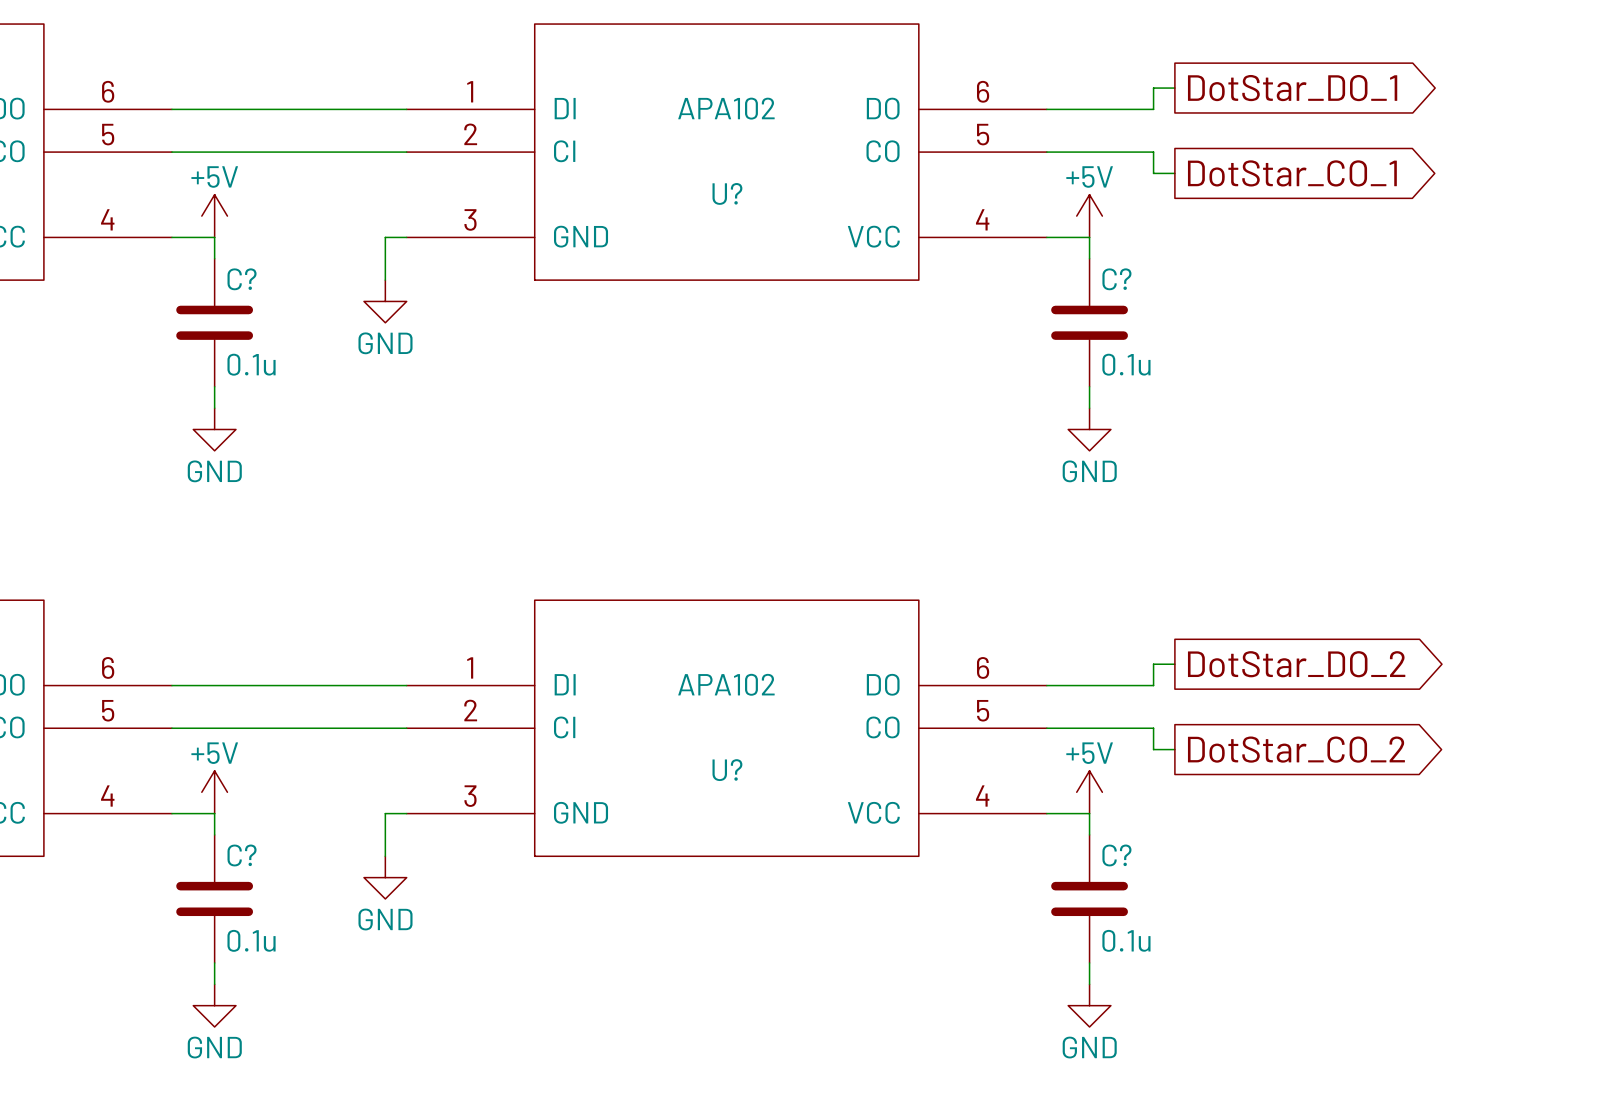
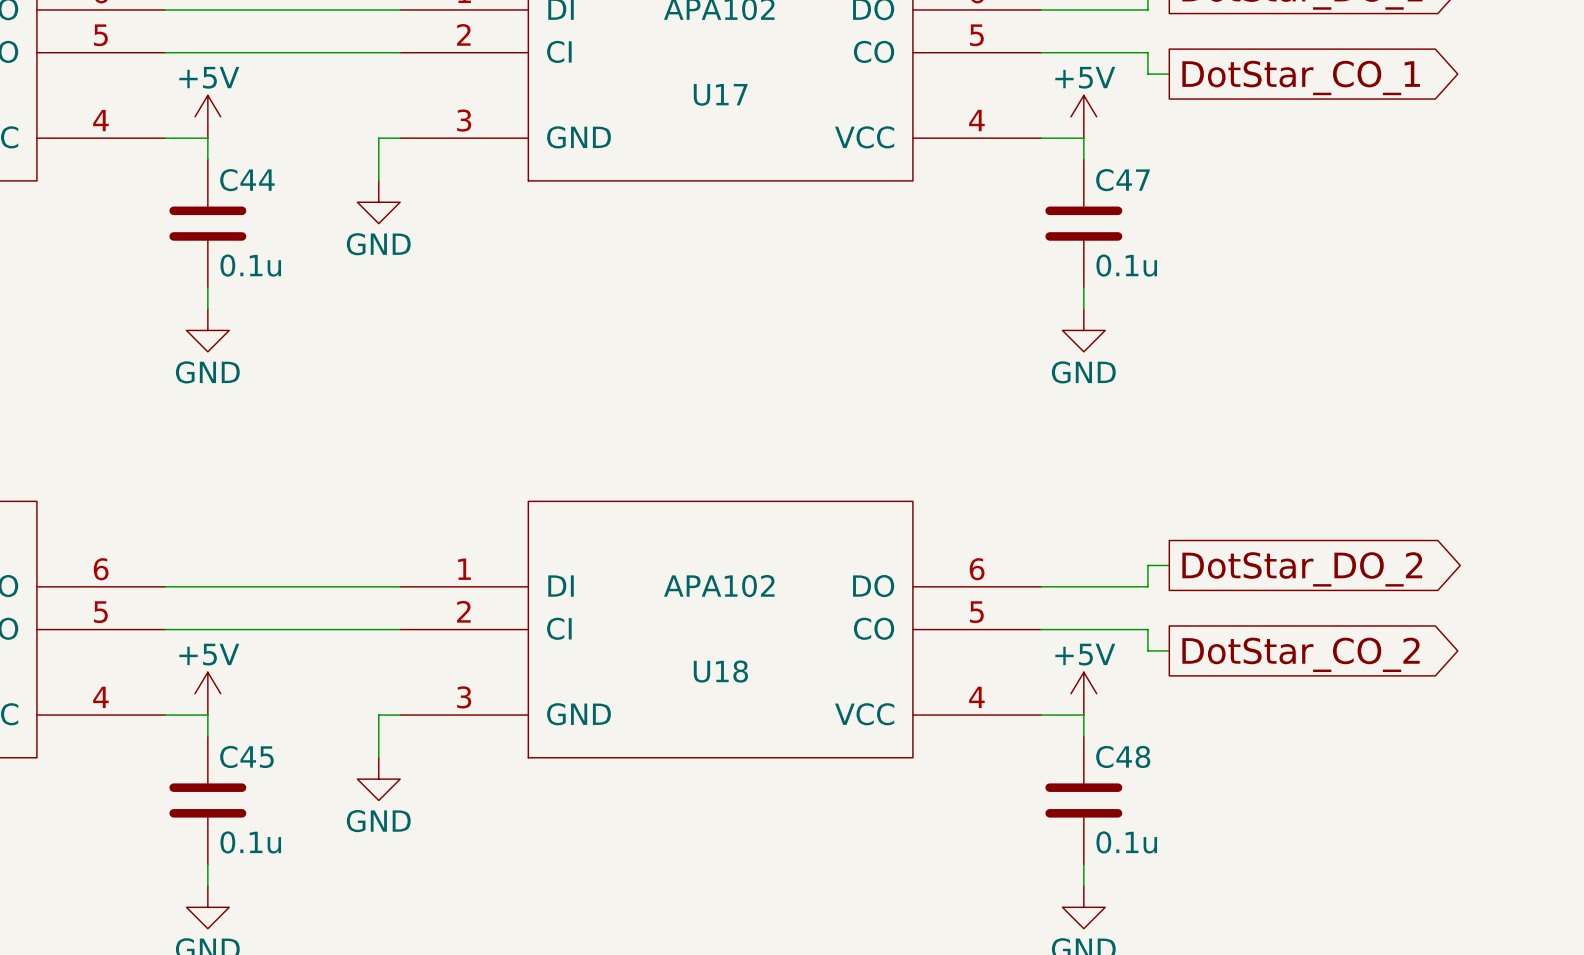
U? name: U? (727, 193) -> U17 (720, 94)
C? name: C? (242, 279) -> C44 (247, 180)
C? name: C? (1116, 279) -> C47 (1122, 180)
U? name: U? (727, 770) -> U18 (720, 671)
C? name: C? (242, 855) -> C45 (246, 756)
C? name: C? (1116, 855) -> C48 (1123, 756)

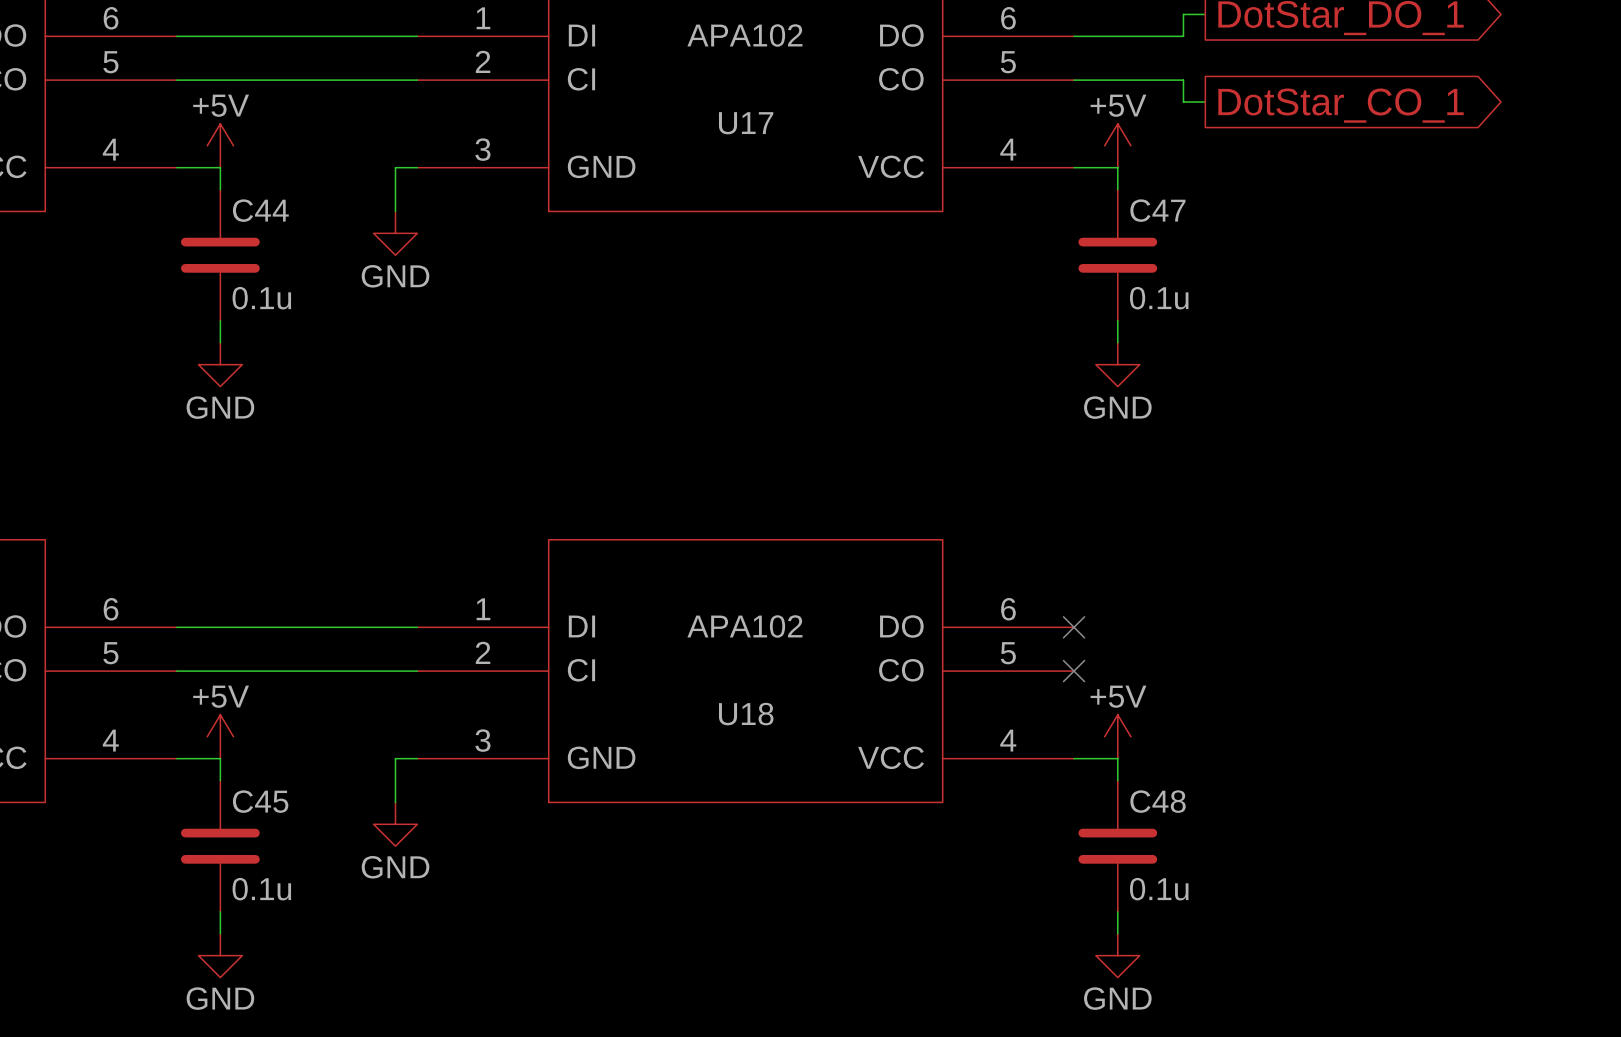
wire: (1169, 565) (1147, 565) (1147, 586) (1041, 586) -> none
global label: DotStar_DO_2 (1302, 569) -> none
no-connect mark: none -> (1074, 627)
wire: (1041, 629) (1147, 629) (1147, 650) (1169, 650) -> none
no-connect mark: none -> (1074, 671)
global label: DotStar_CO_2 (1301, 654) -> none

